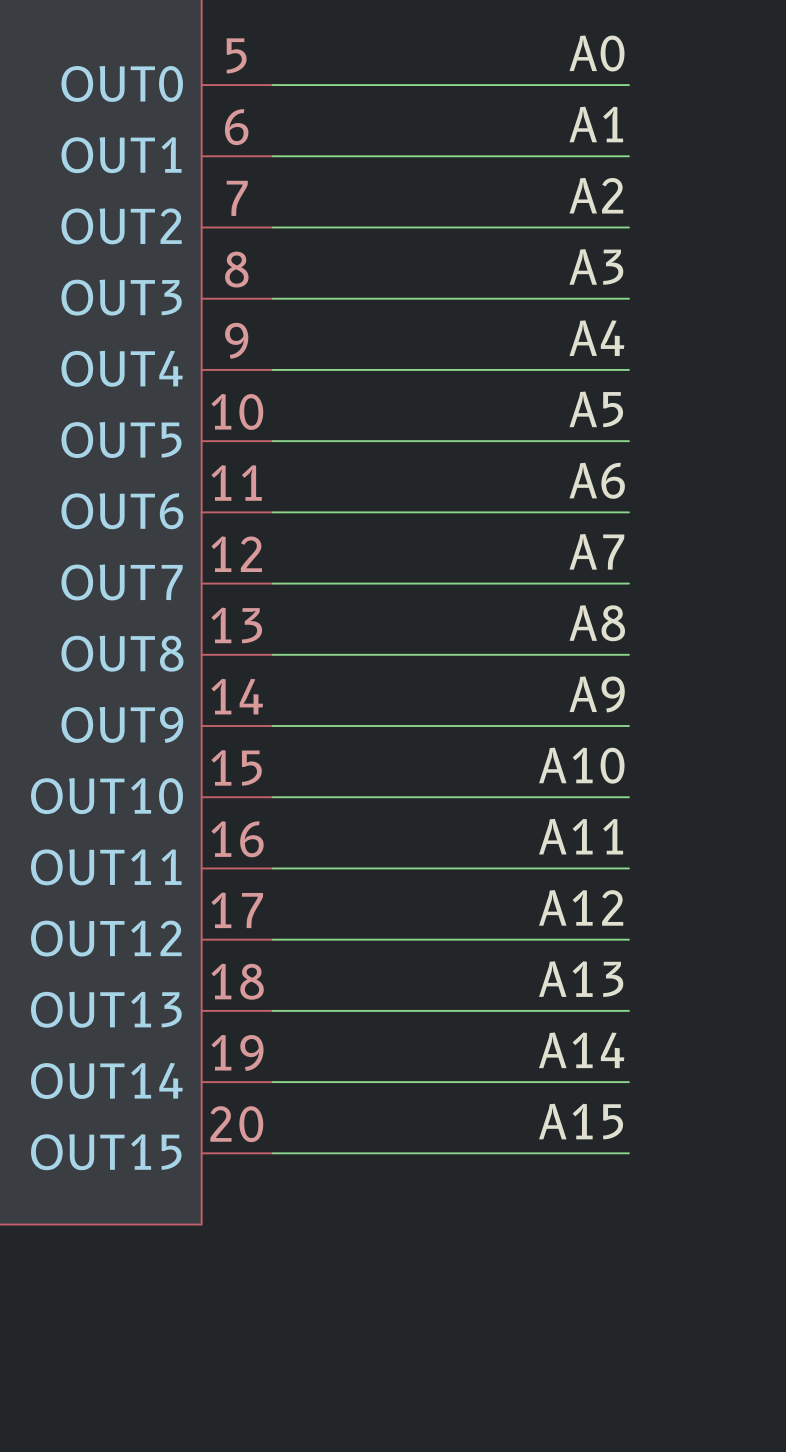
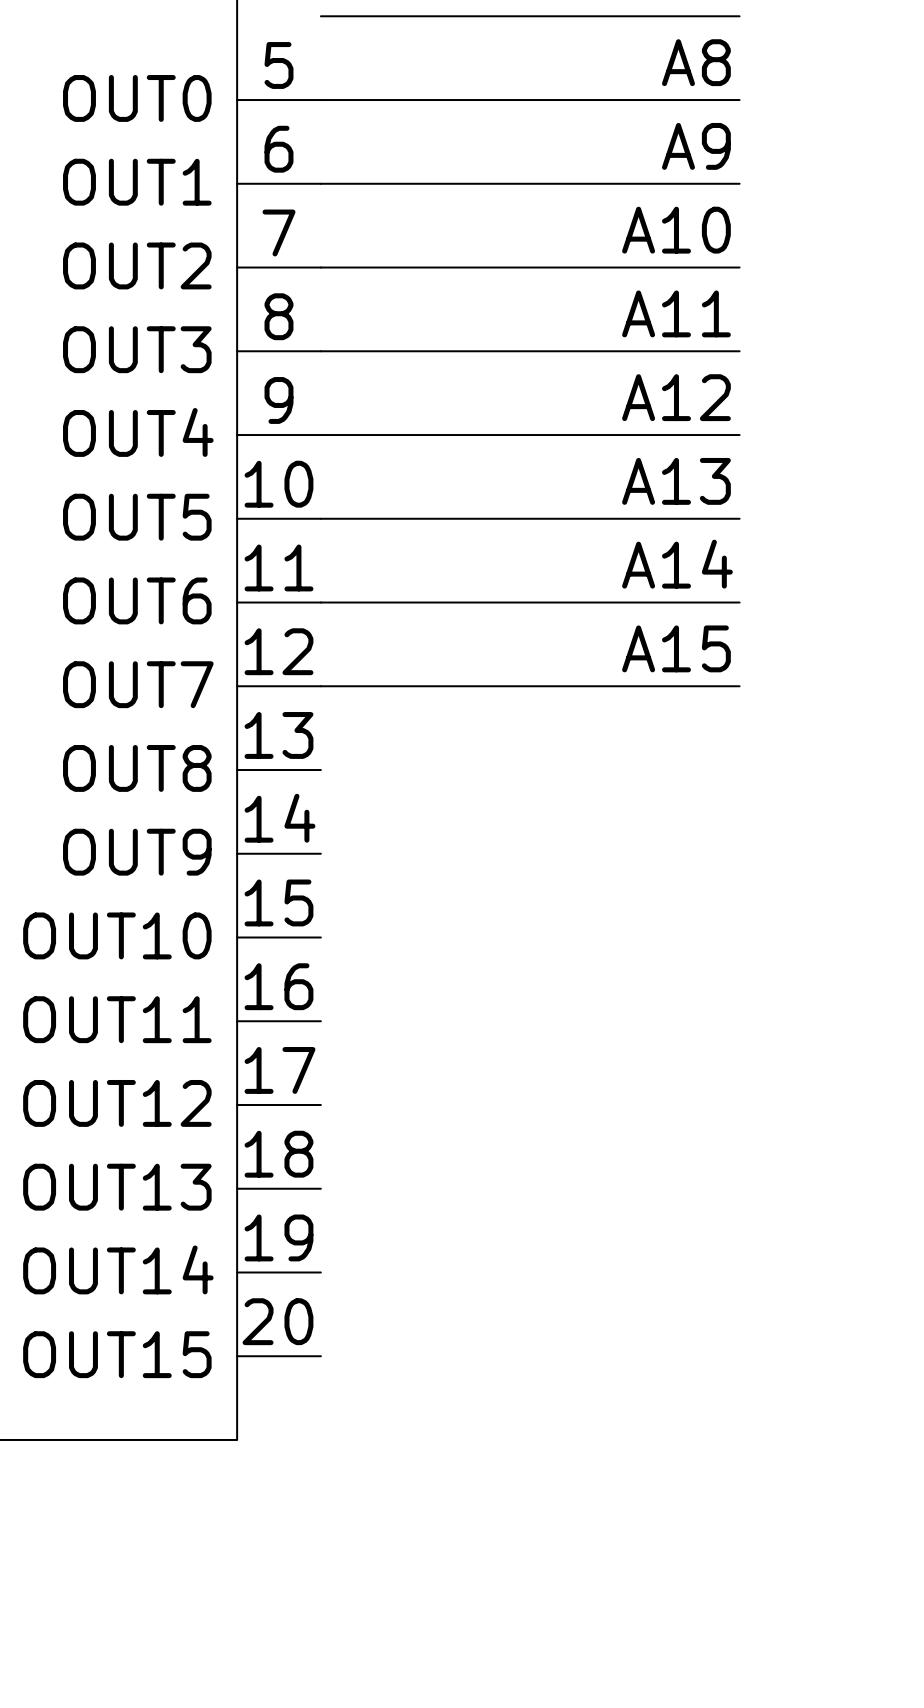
label: A0 (597, 53) -> A8 (696, 62)
label: A1 (596, 124) -> A9 (696, 146)
label: A2 (596, 195) -> A10 (676, 230)
label: A3 (596, 266) -> A11 (676, 313)
label: A4 (596, 338) -> A12 (676, 397)
label: A5 (596, 409) -> A13 (676, 481)
label: A6 (597, 480) -> A14 (677, 564)
label: A7 (596, 551) -> A15 (676, 648)
label: A8 (597, 623) -> none
wire: (272, 654) (628, 654) -> (320, 16) (739, 16)
label: A9 (597, 694) -> none
wire: (272, 726) (628, 726) -> none
label: A10 (581, 765) -> none
wire: (272, 797) (628, 797) -> none
label: A11 (581, 836) -> none
wire: (272, 868) (628, 868) -> none
label: A12 (581, 907) -> none
wire: (272, 939) (628, 939) -> none
label: A13 (581, 979) -> none
wire: (272, 1010) (628, 1010) -> none
label: A14 (581, 1050) -> none
wire: (272, 1082) (628, 1082) -> none
label: A15 (581, 1121) -> none
wire: (272, 1153) (628, 1153) -> none

